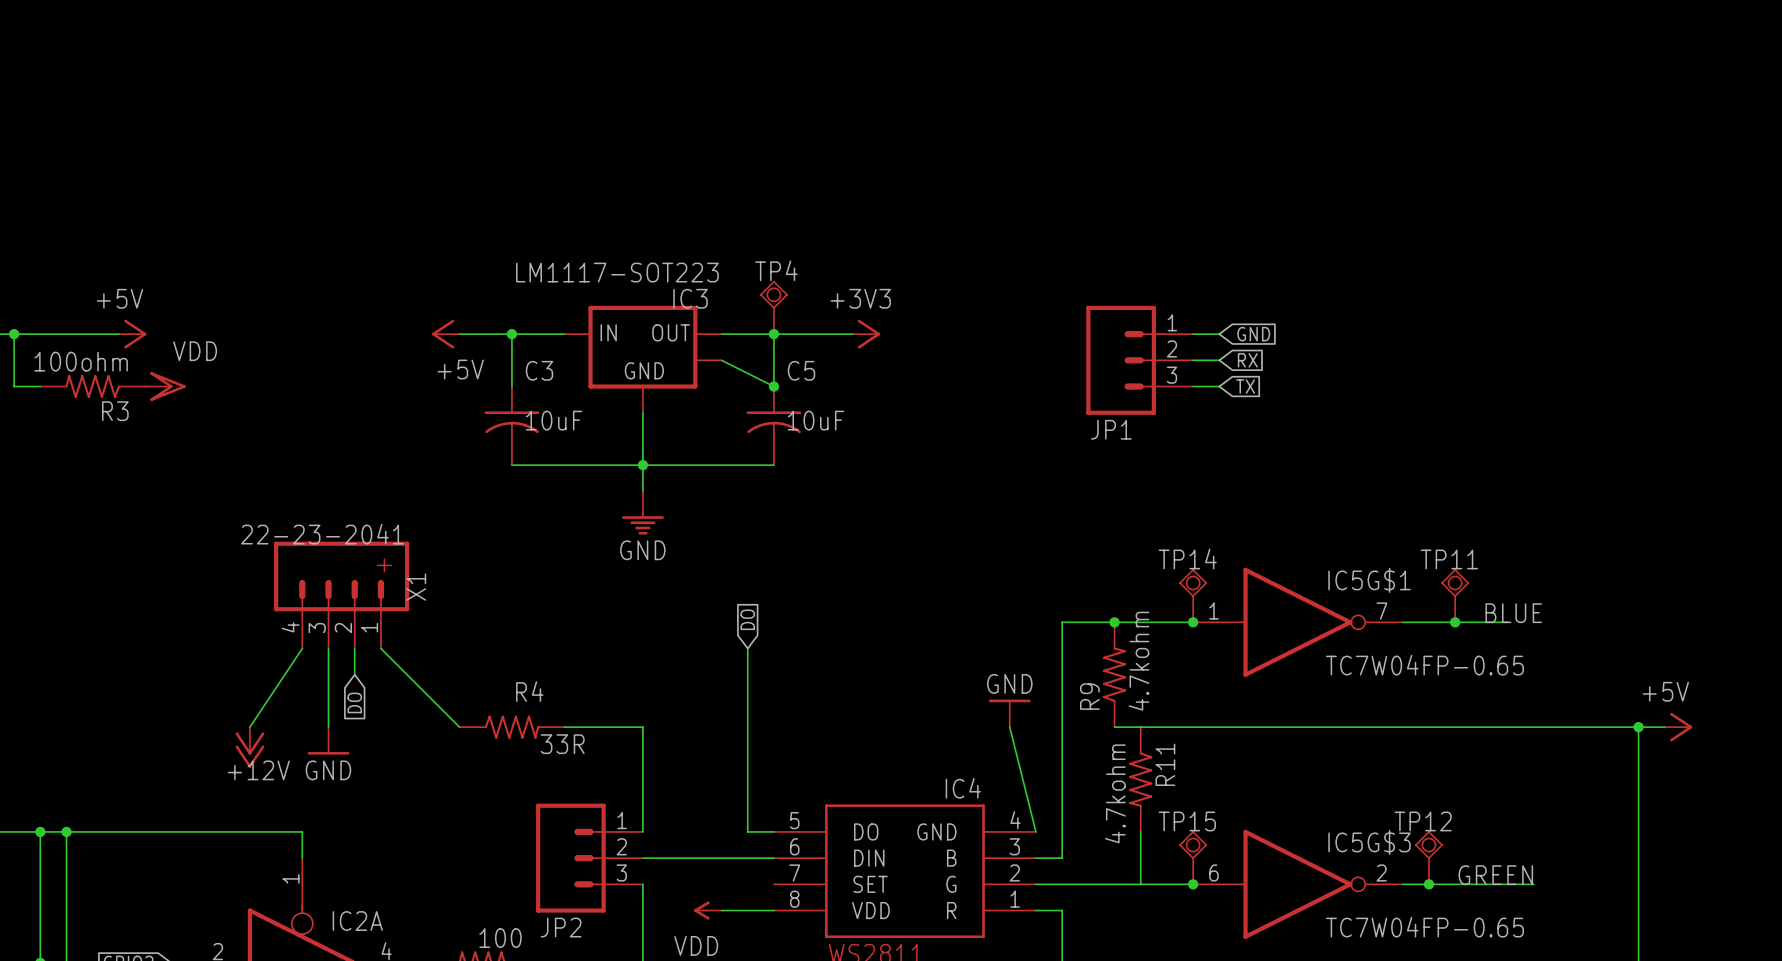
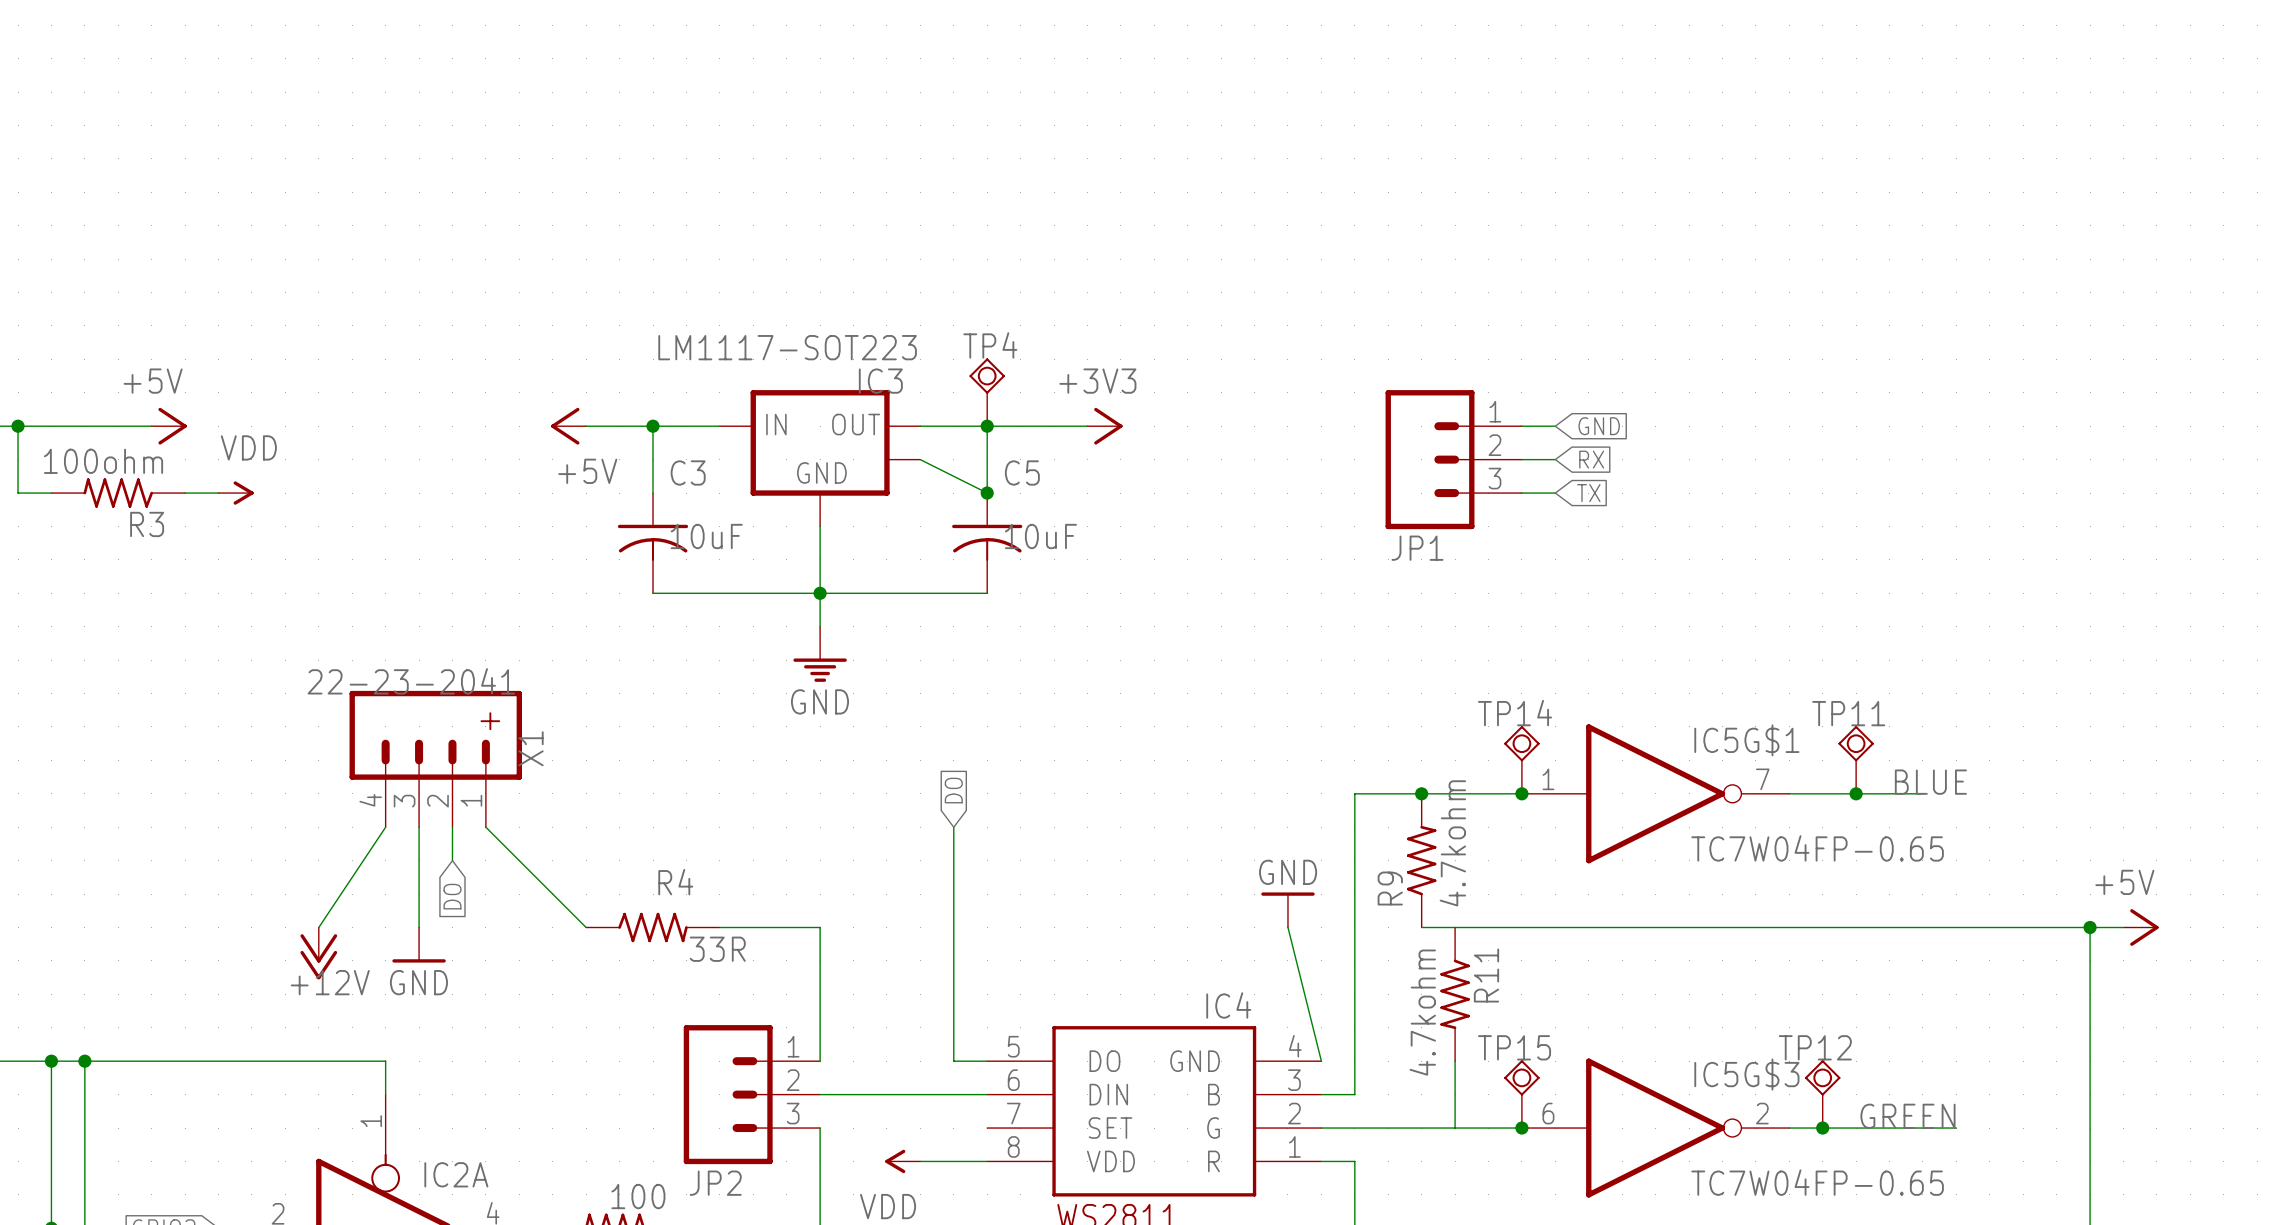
power symbol: VDD (165, 386) -> none
power symbol: none -> VDD (236, 493)

